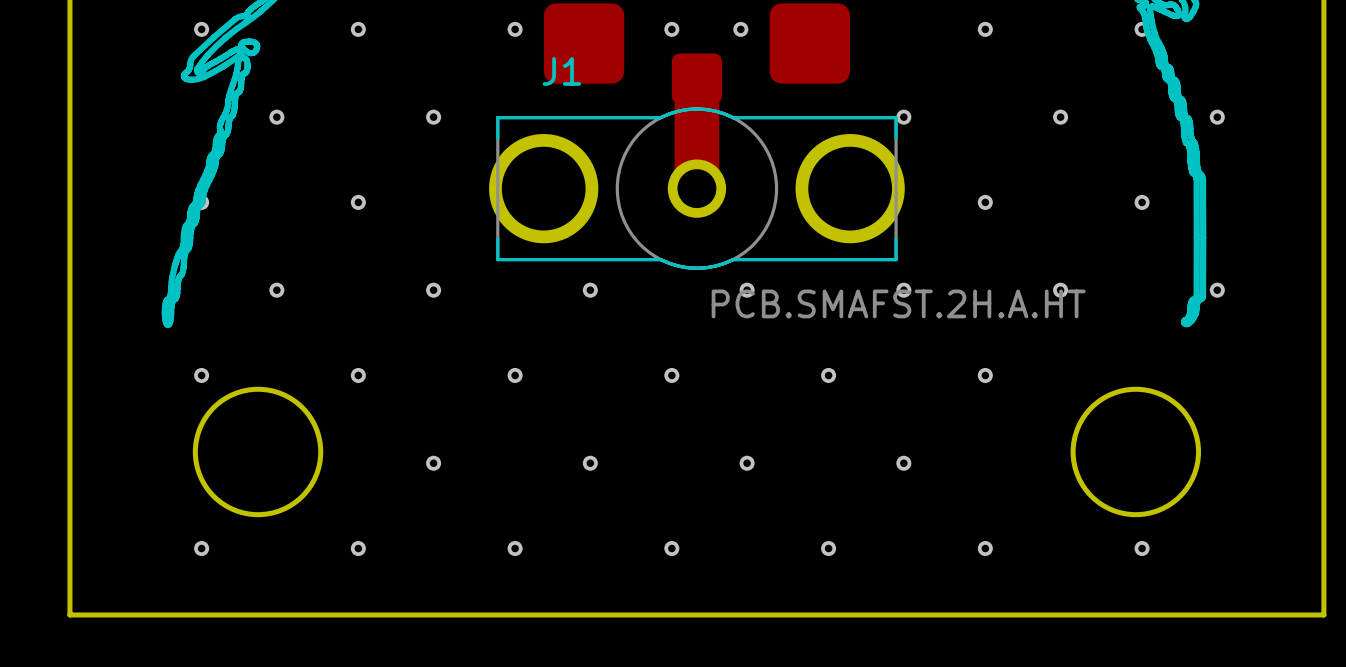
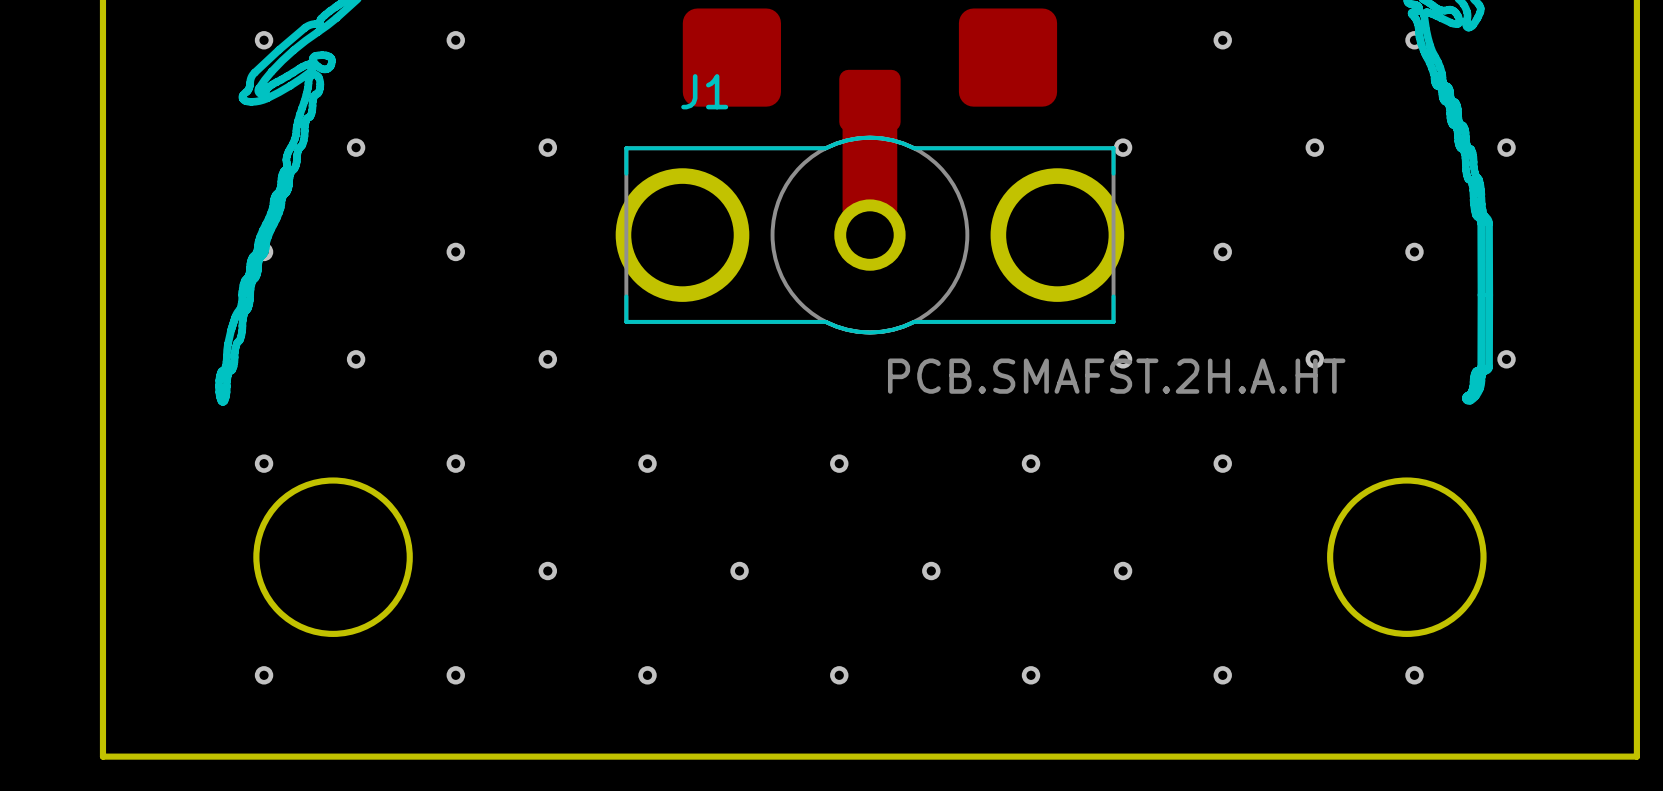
via: (515, 29) -> none
via: (671, 29) -> none
via: (740, 29) -> none
via: (590, 290) -> none
via: (747, 290) -> none

